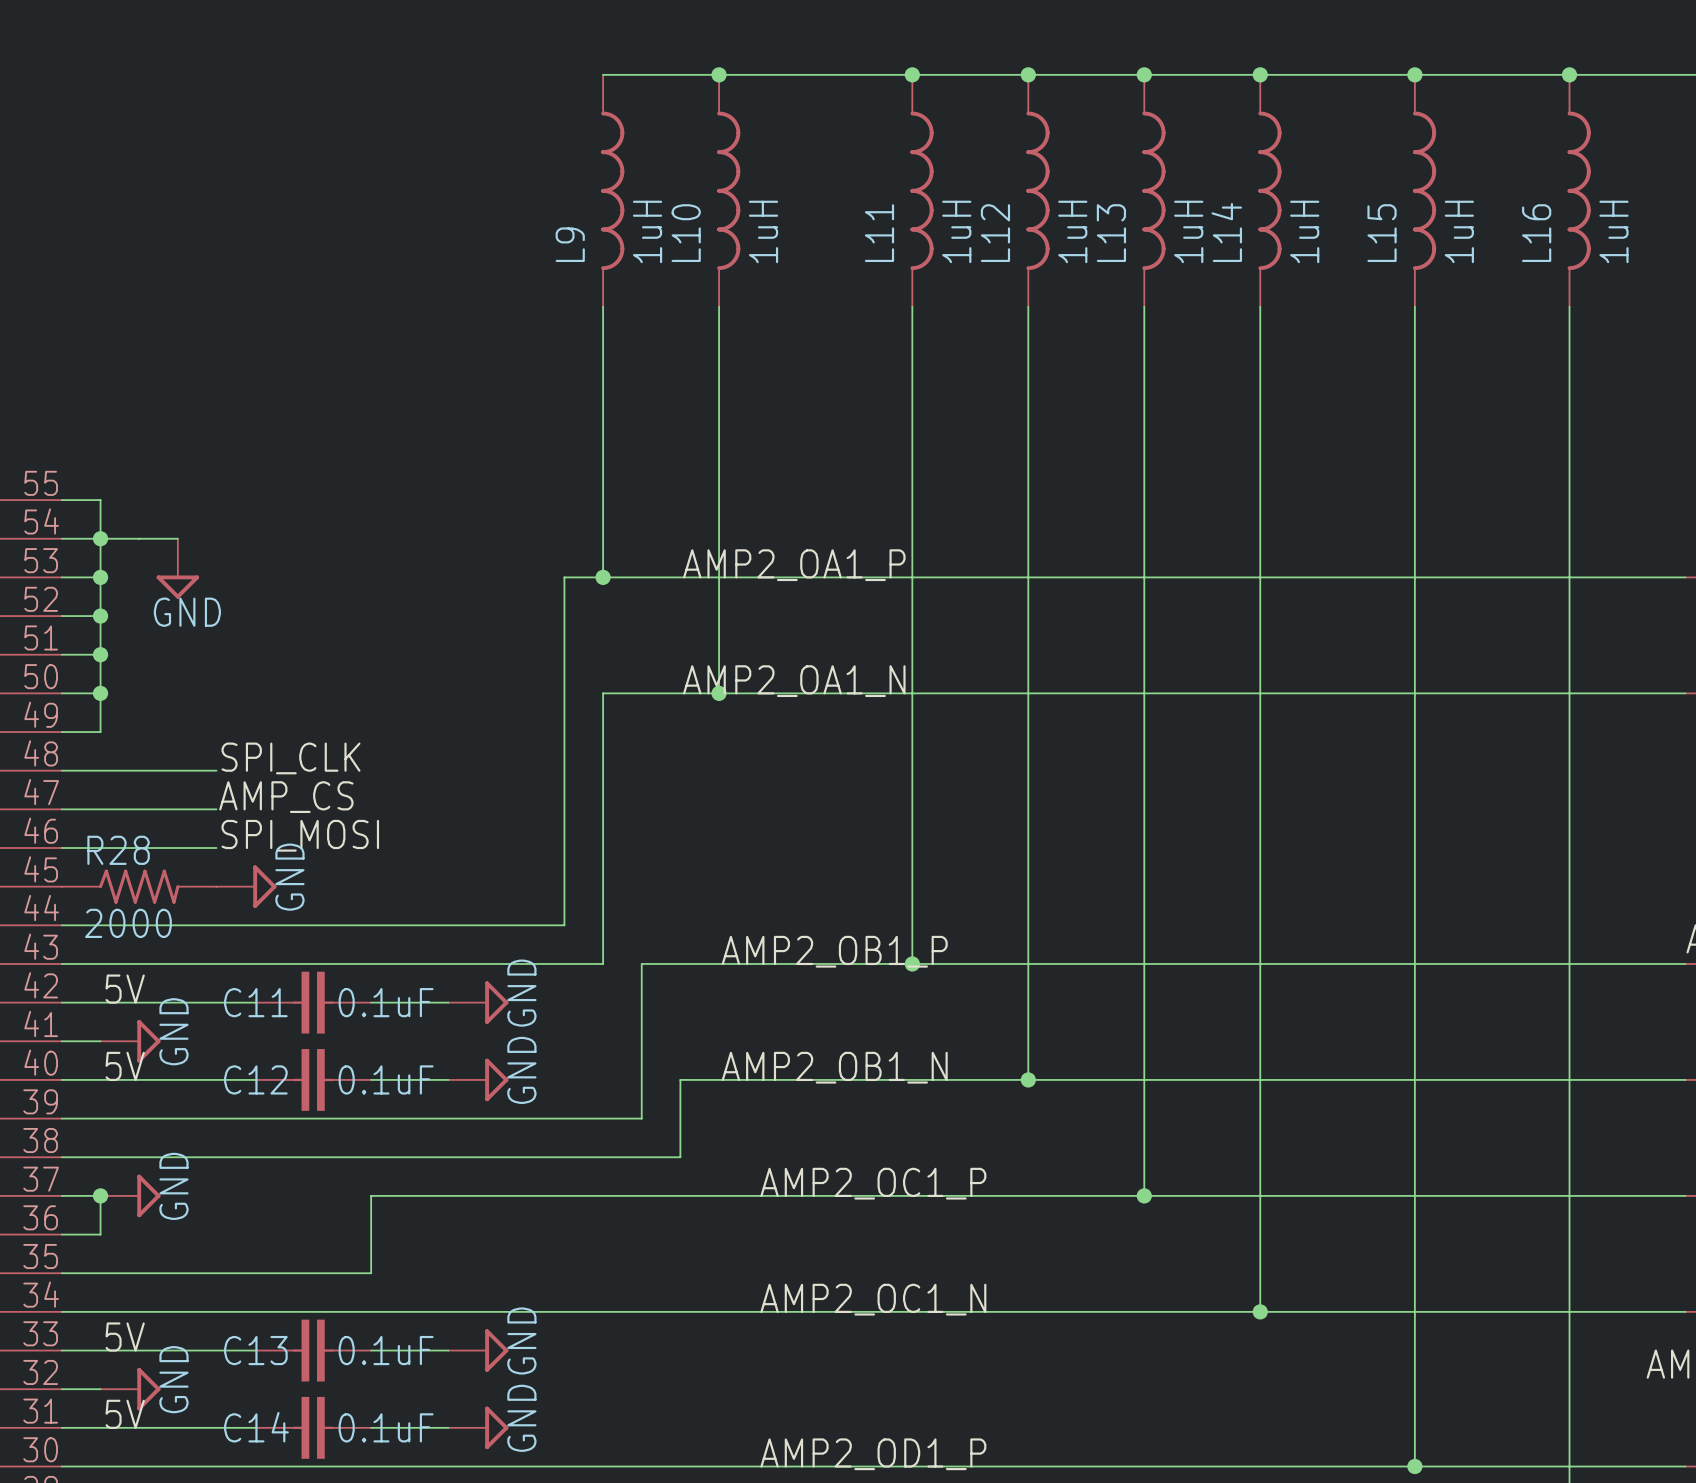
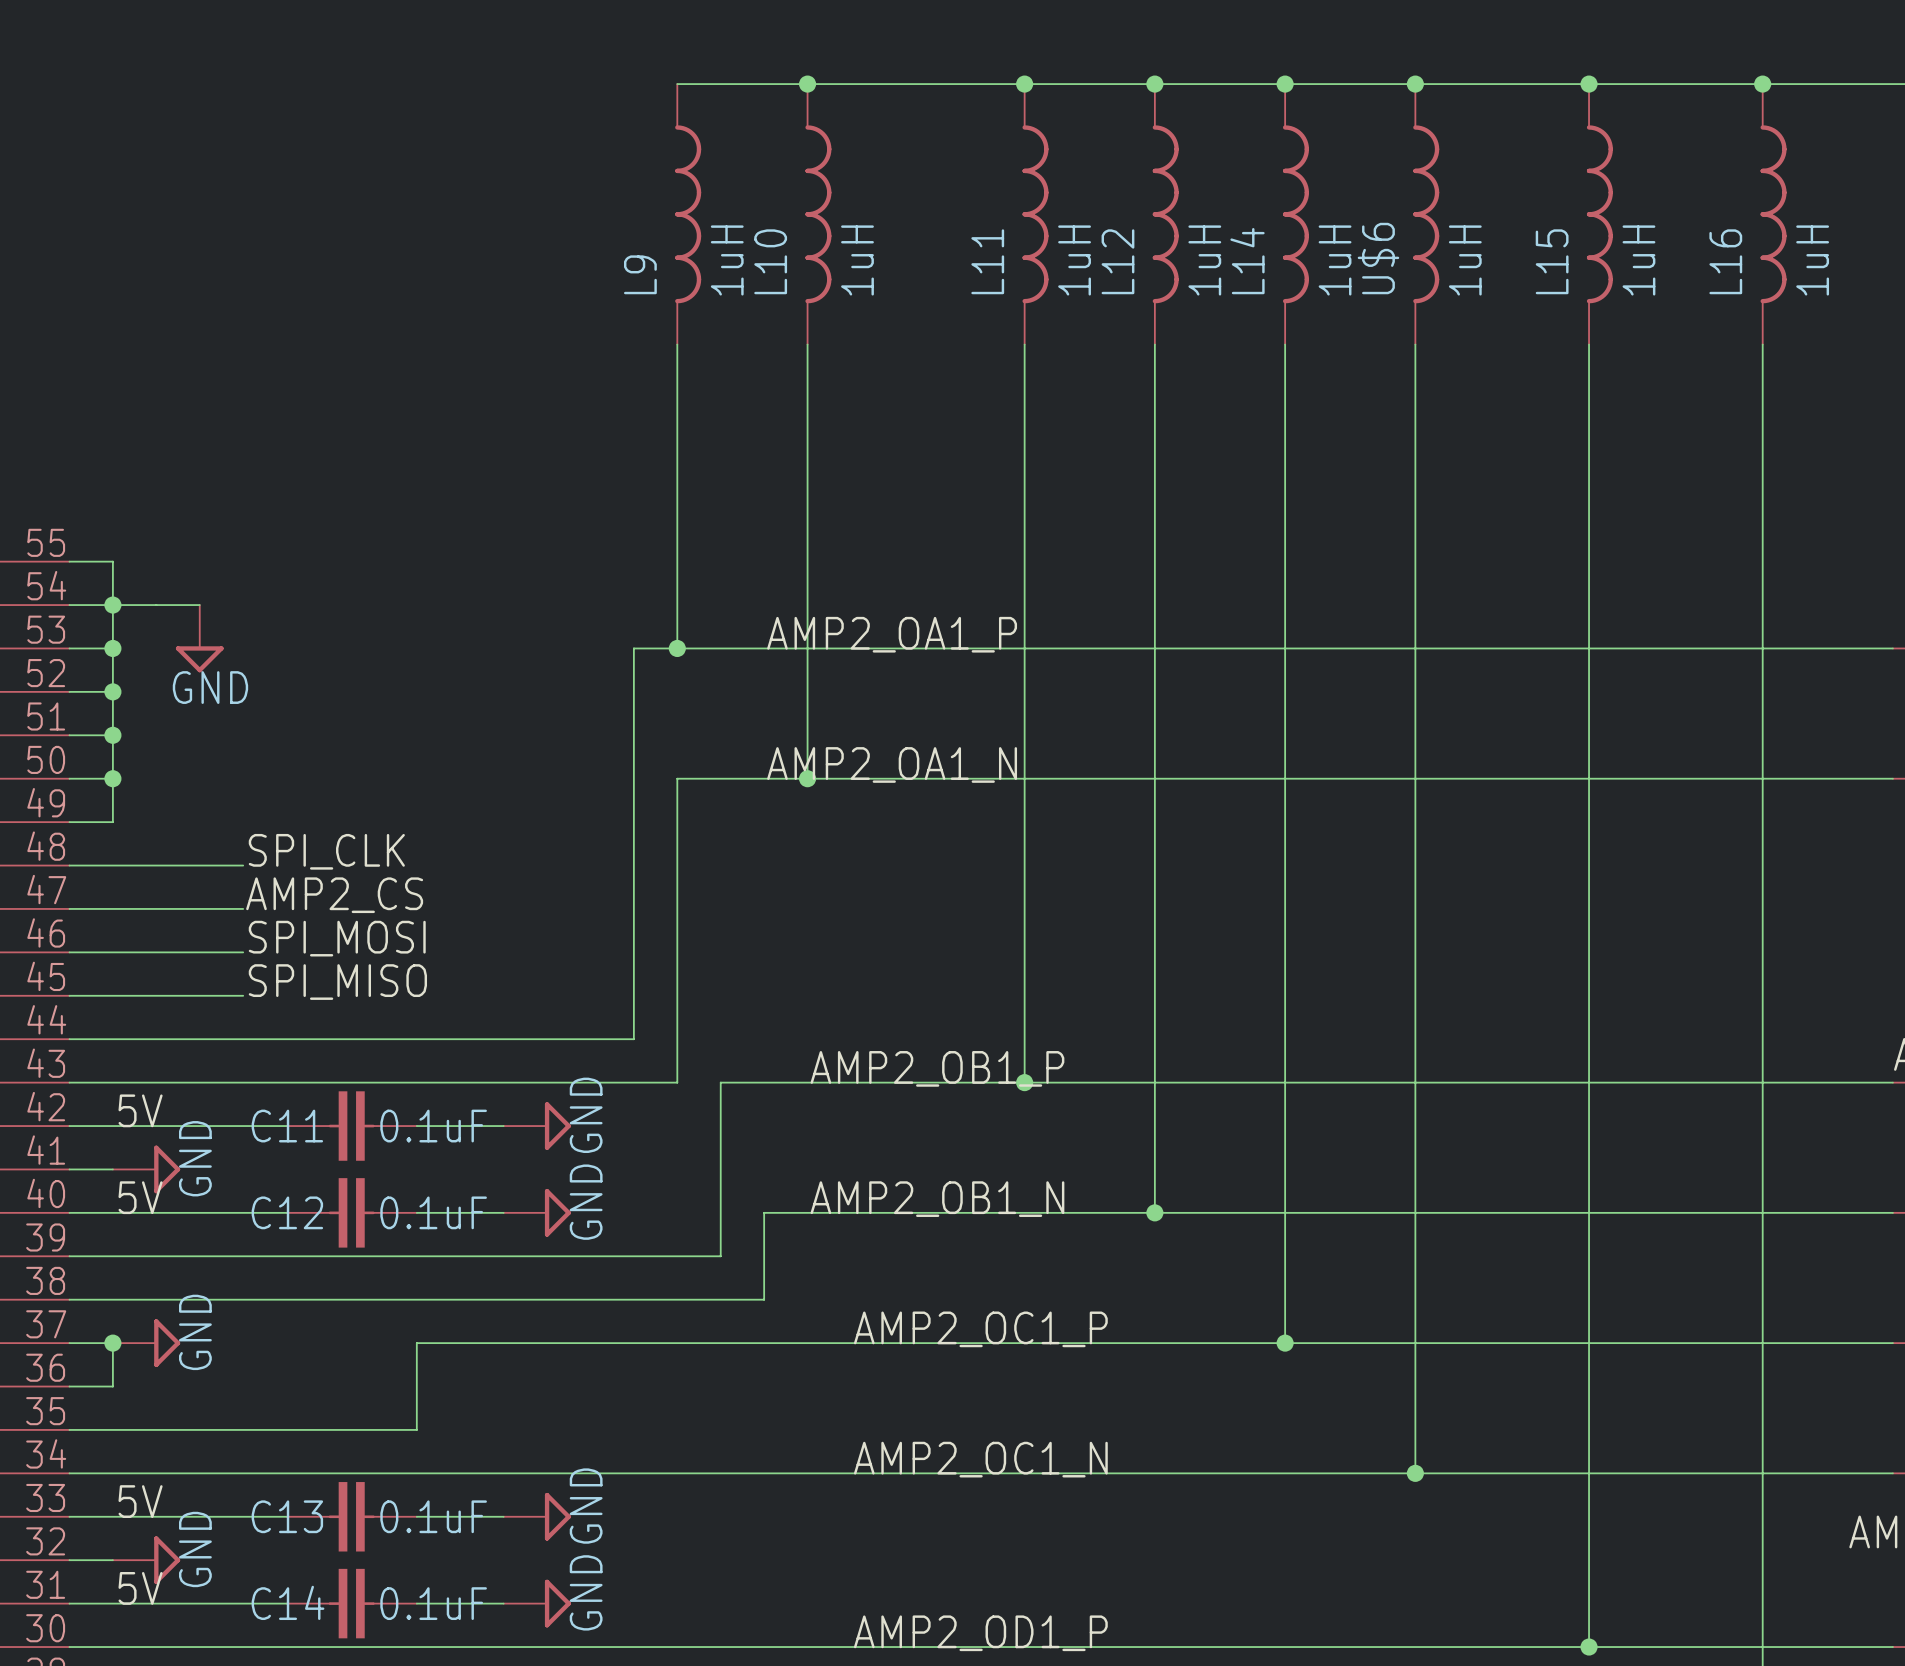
L14 name: L14 (1226, 232) -> U$6 (1378, 258)
L13 name: L13 (1111, 233) -> L14 (1247, 261)
label: AMP_CS (286, 797) -> AMP2_CS (334, 895)
label: none -> SPI_MISO (337, 982)
R28: 2000 (139, 886) -> none
power symbol: GND (246, 886) -> none

